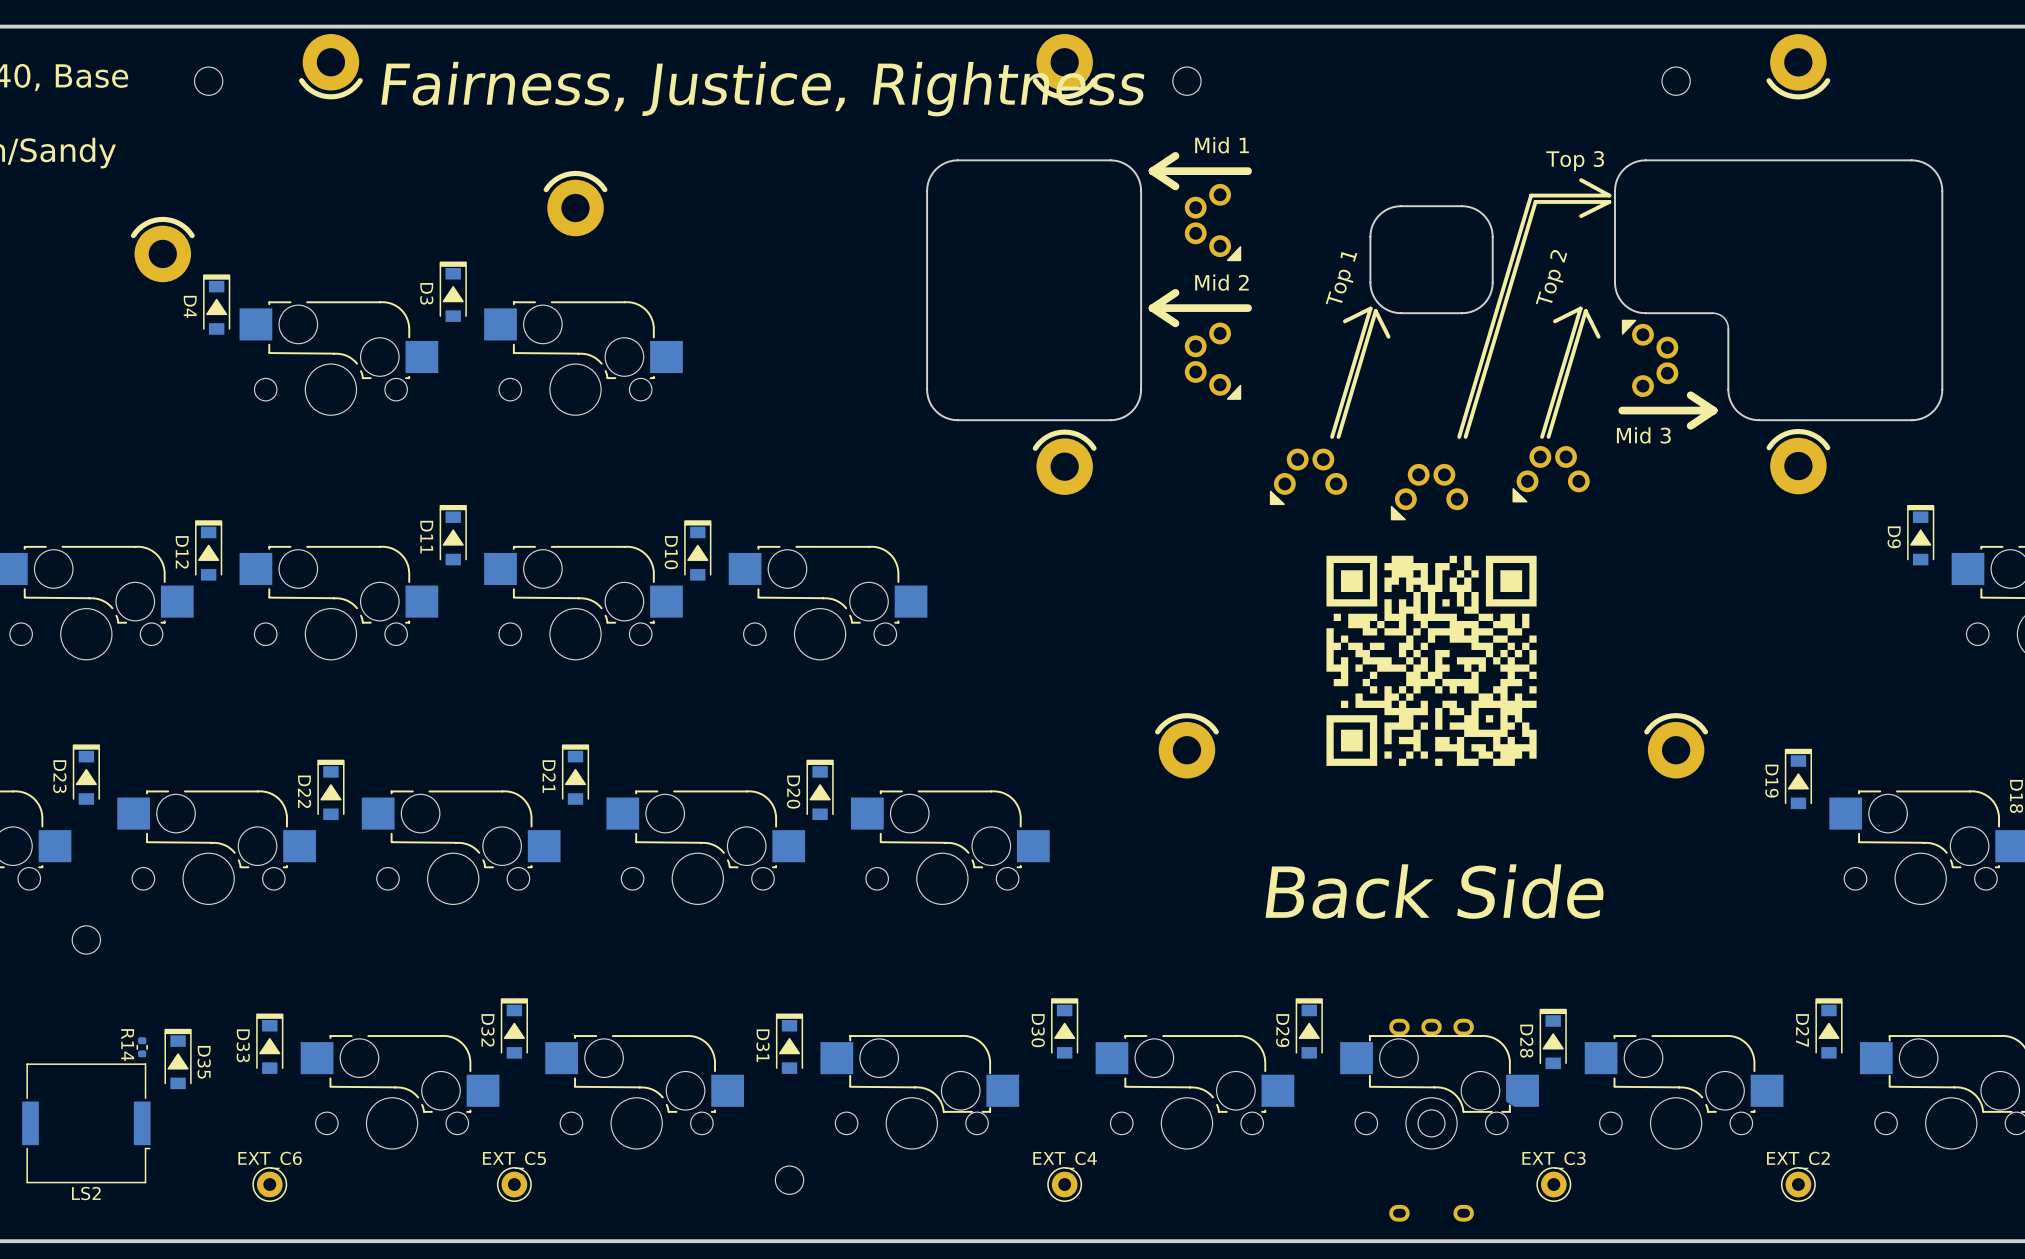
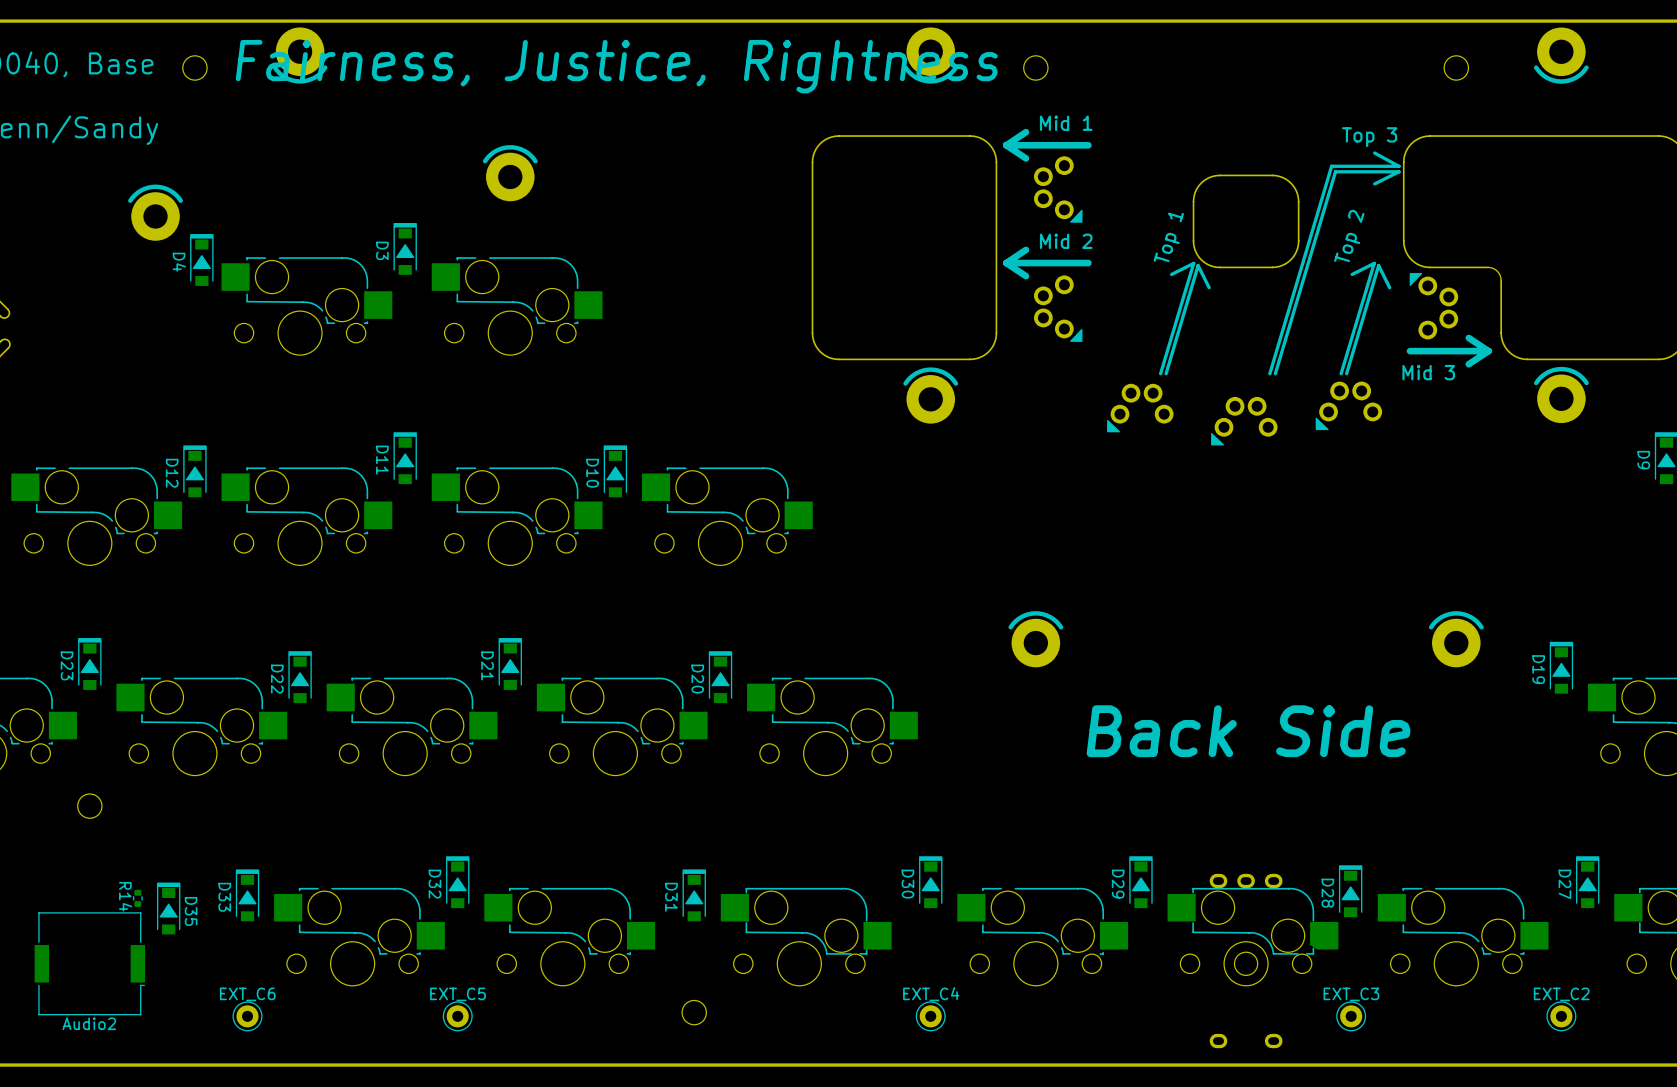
text: none -> Fairness, Justice, Rightness (616, 66)
text: Fairness, Justice, Rightness (762, 89) -> none
drawing: [1326, 555, 1537, 766] -> none
text position: Back Side (1434, 891) -> Back Side (1248, 731)
LS2 text: none -> Audio2 (89, 1023)
LS2 name: LS2 (86, 1193) -> none

